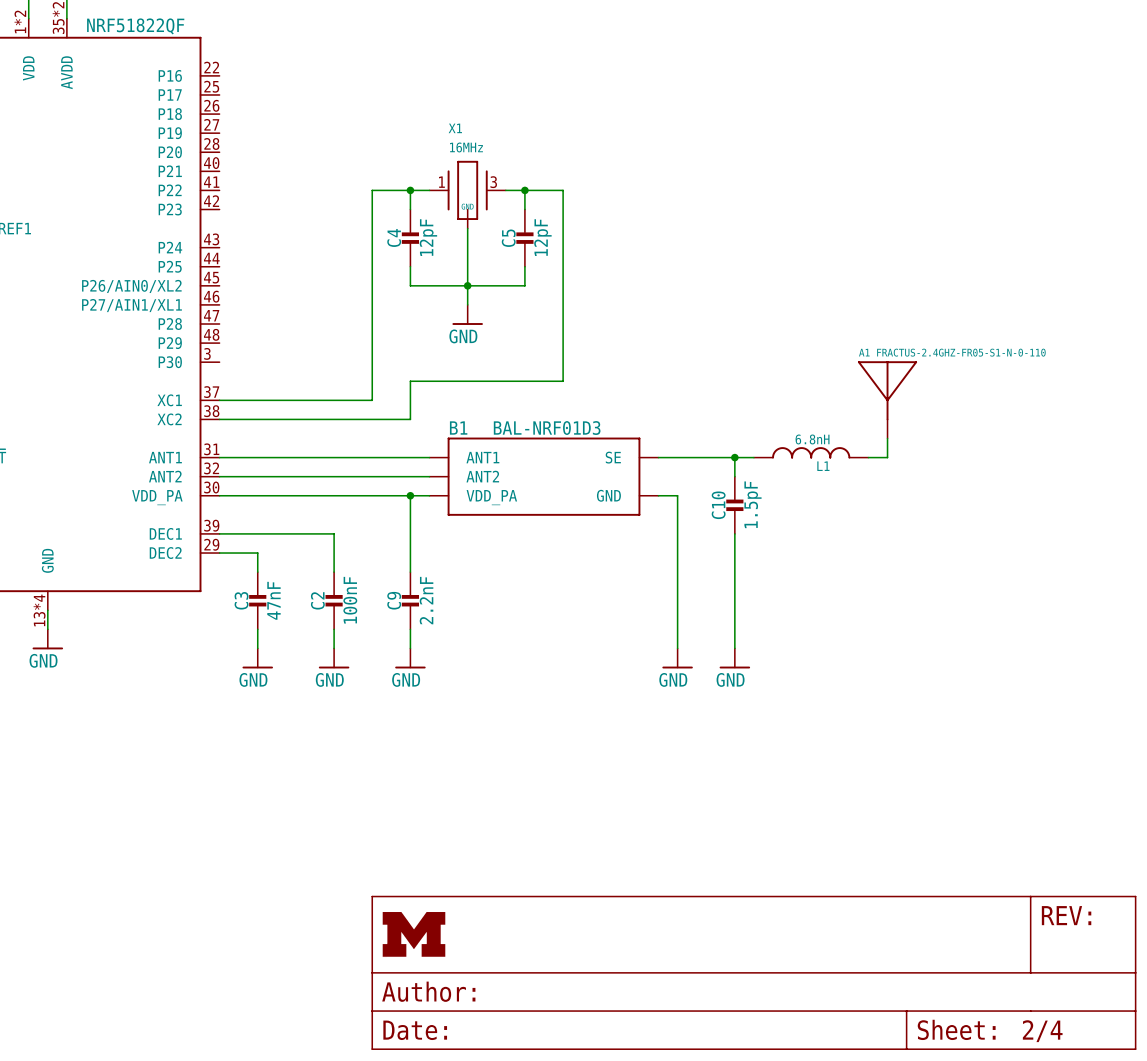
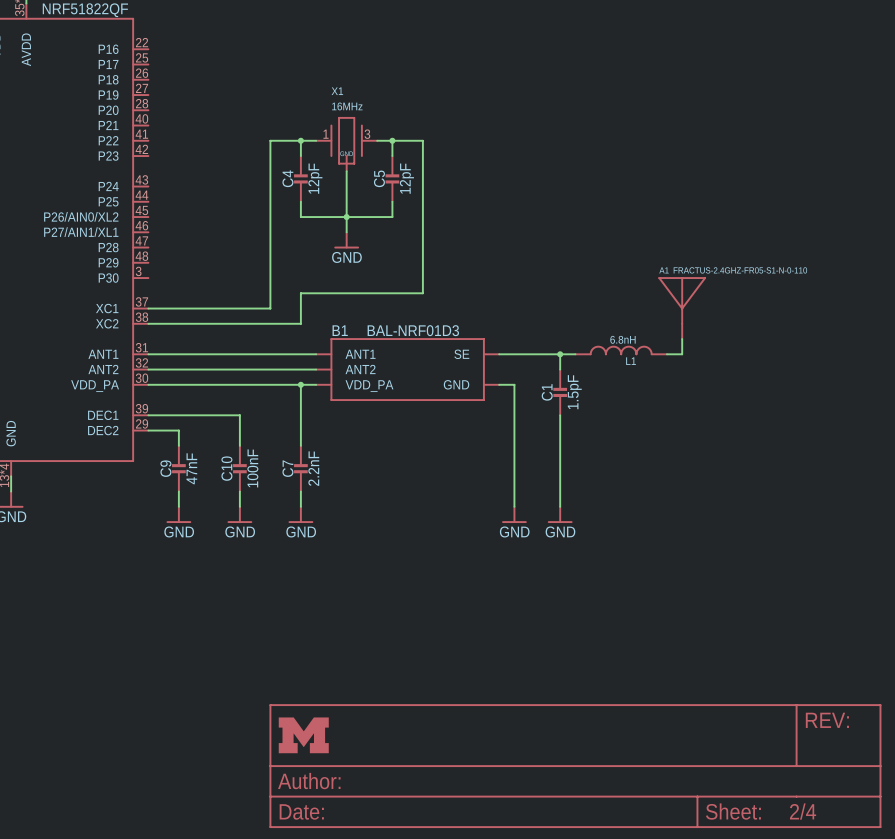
C10 name: C10 (718, 505) -> C1 (547, 392)
C3 name: C3 (241, 600) -> C9 (165, 468)
C2 name: C2 (317, 600) -> C10 (226, 468)
C9 name: C9 (394, 600) -> C7 (287, 468)

